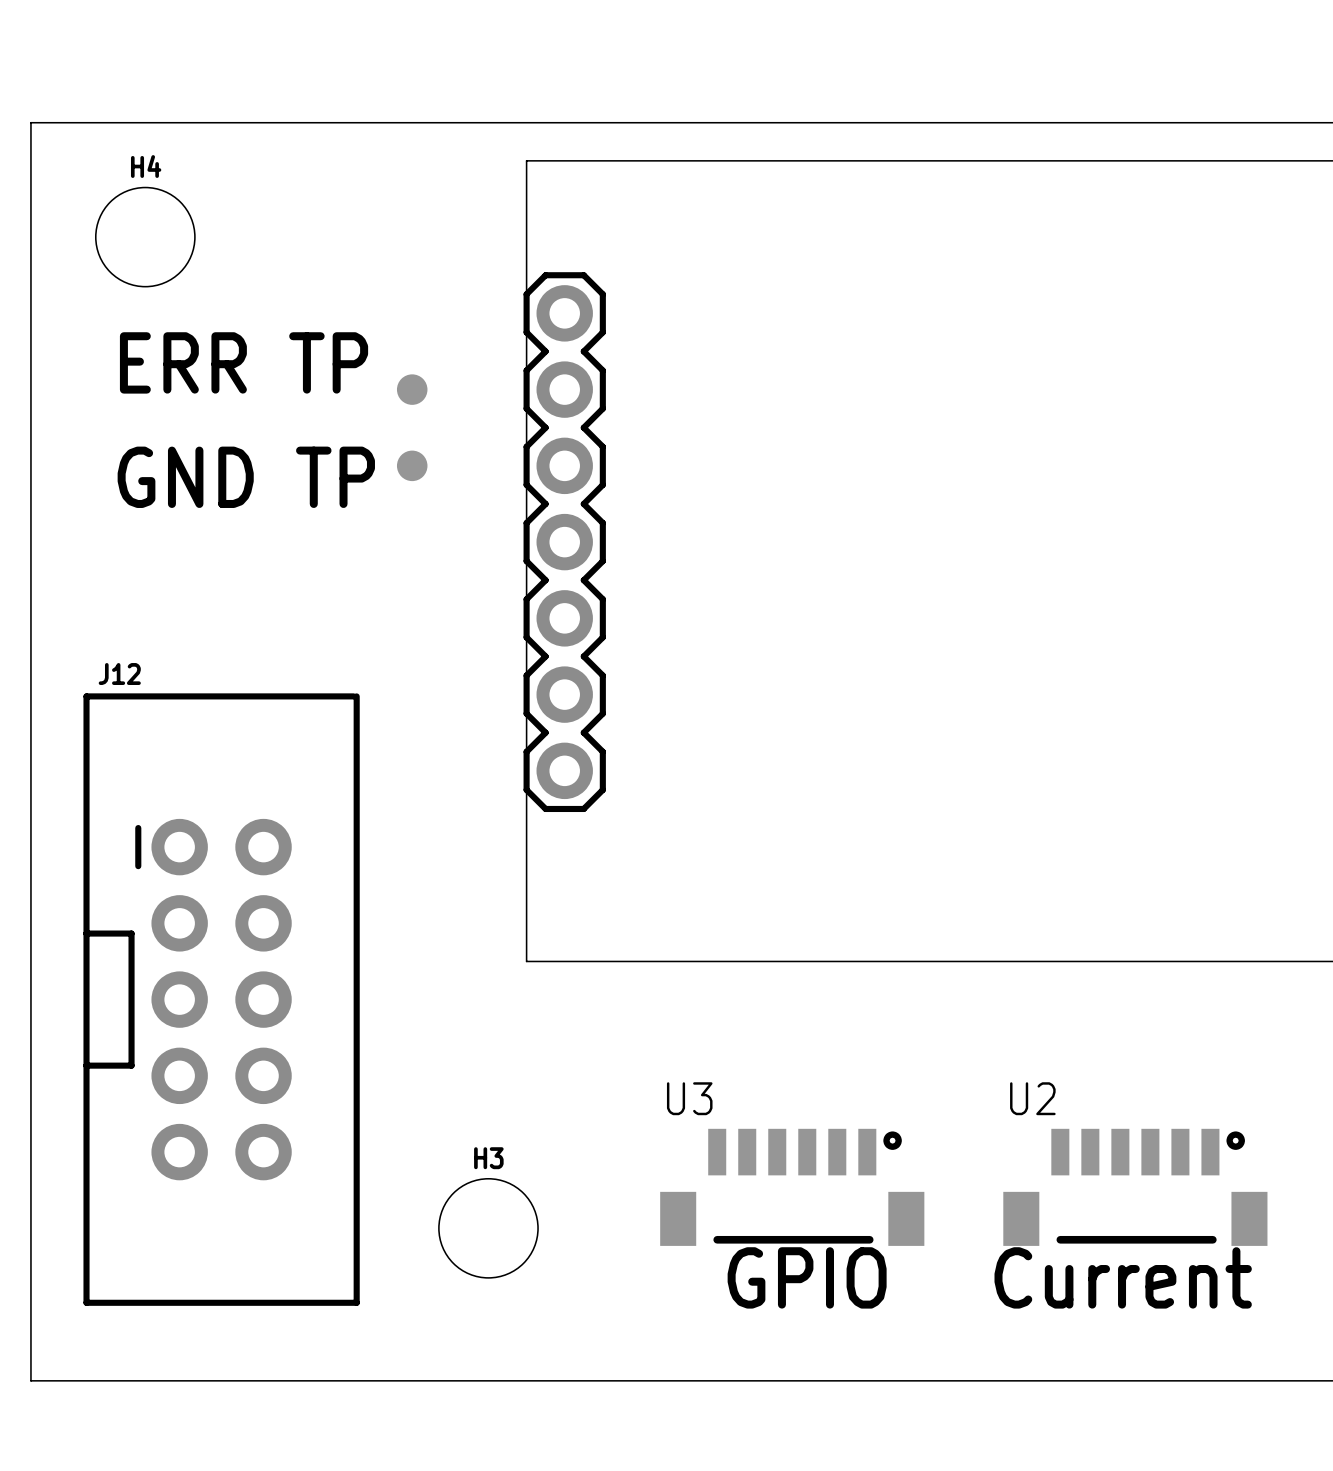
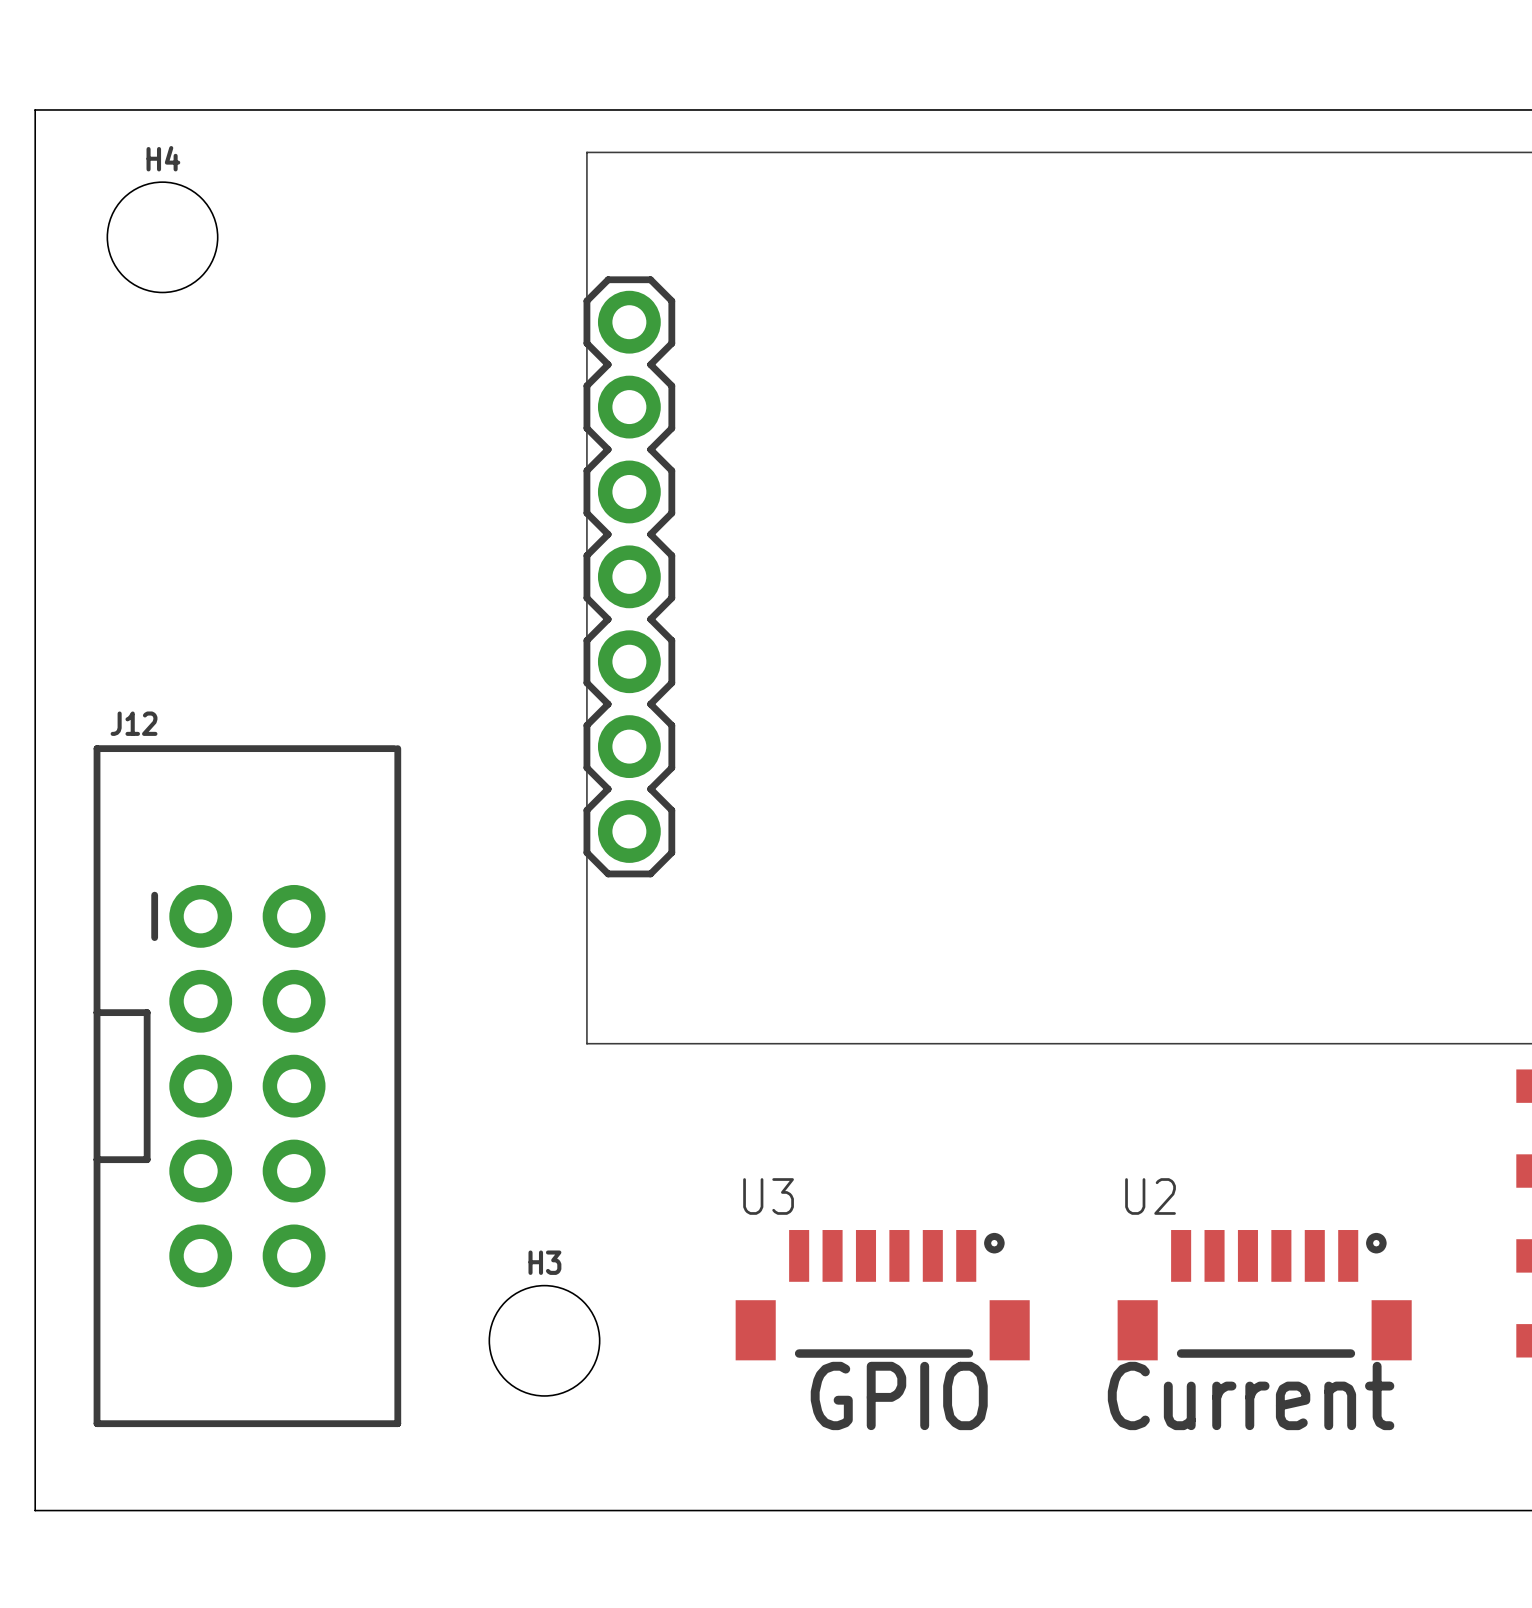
text: ERR TP (244, 362) -> none
part: (412, 389) -> none
part: (412, 465) -> none
text: GND TP (246, 477) -> none

